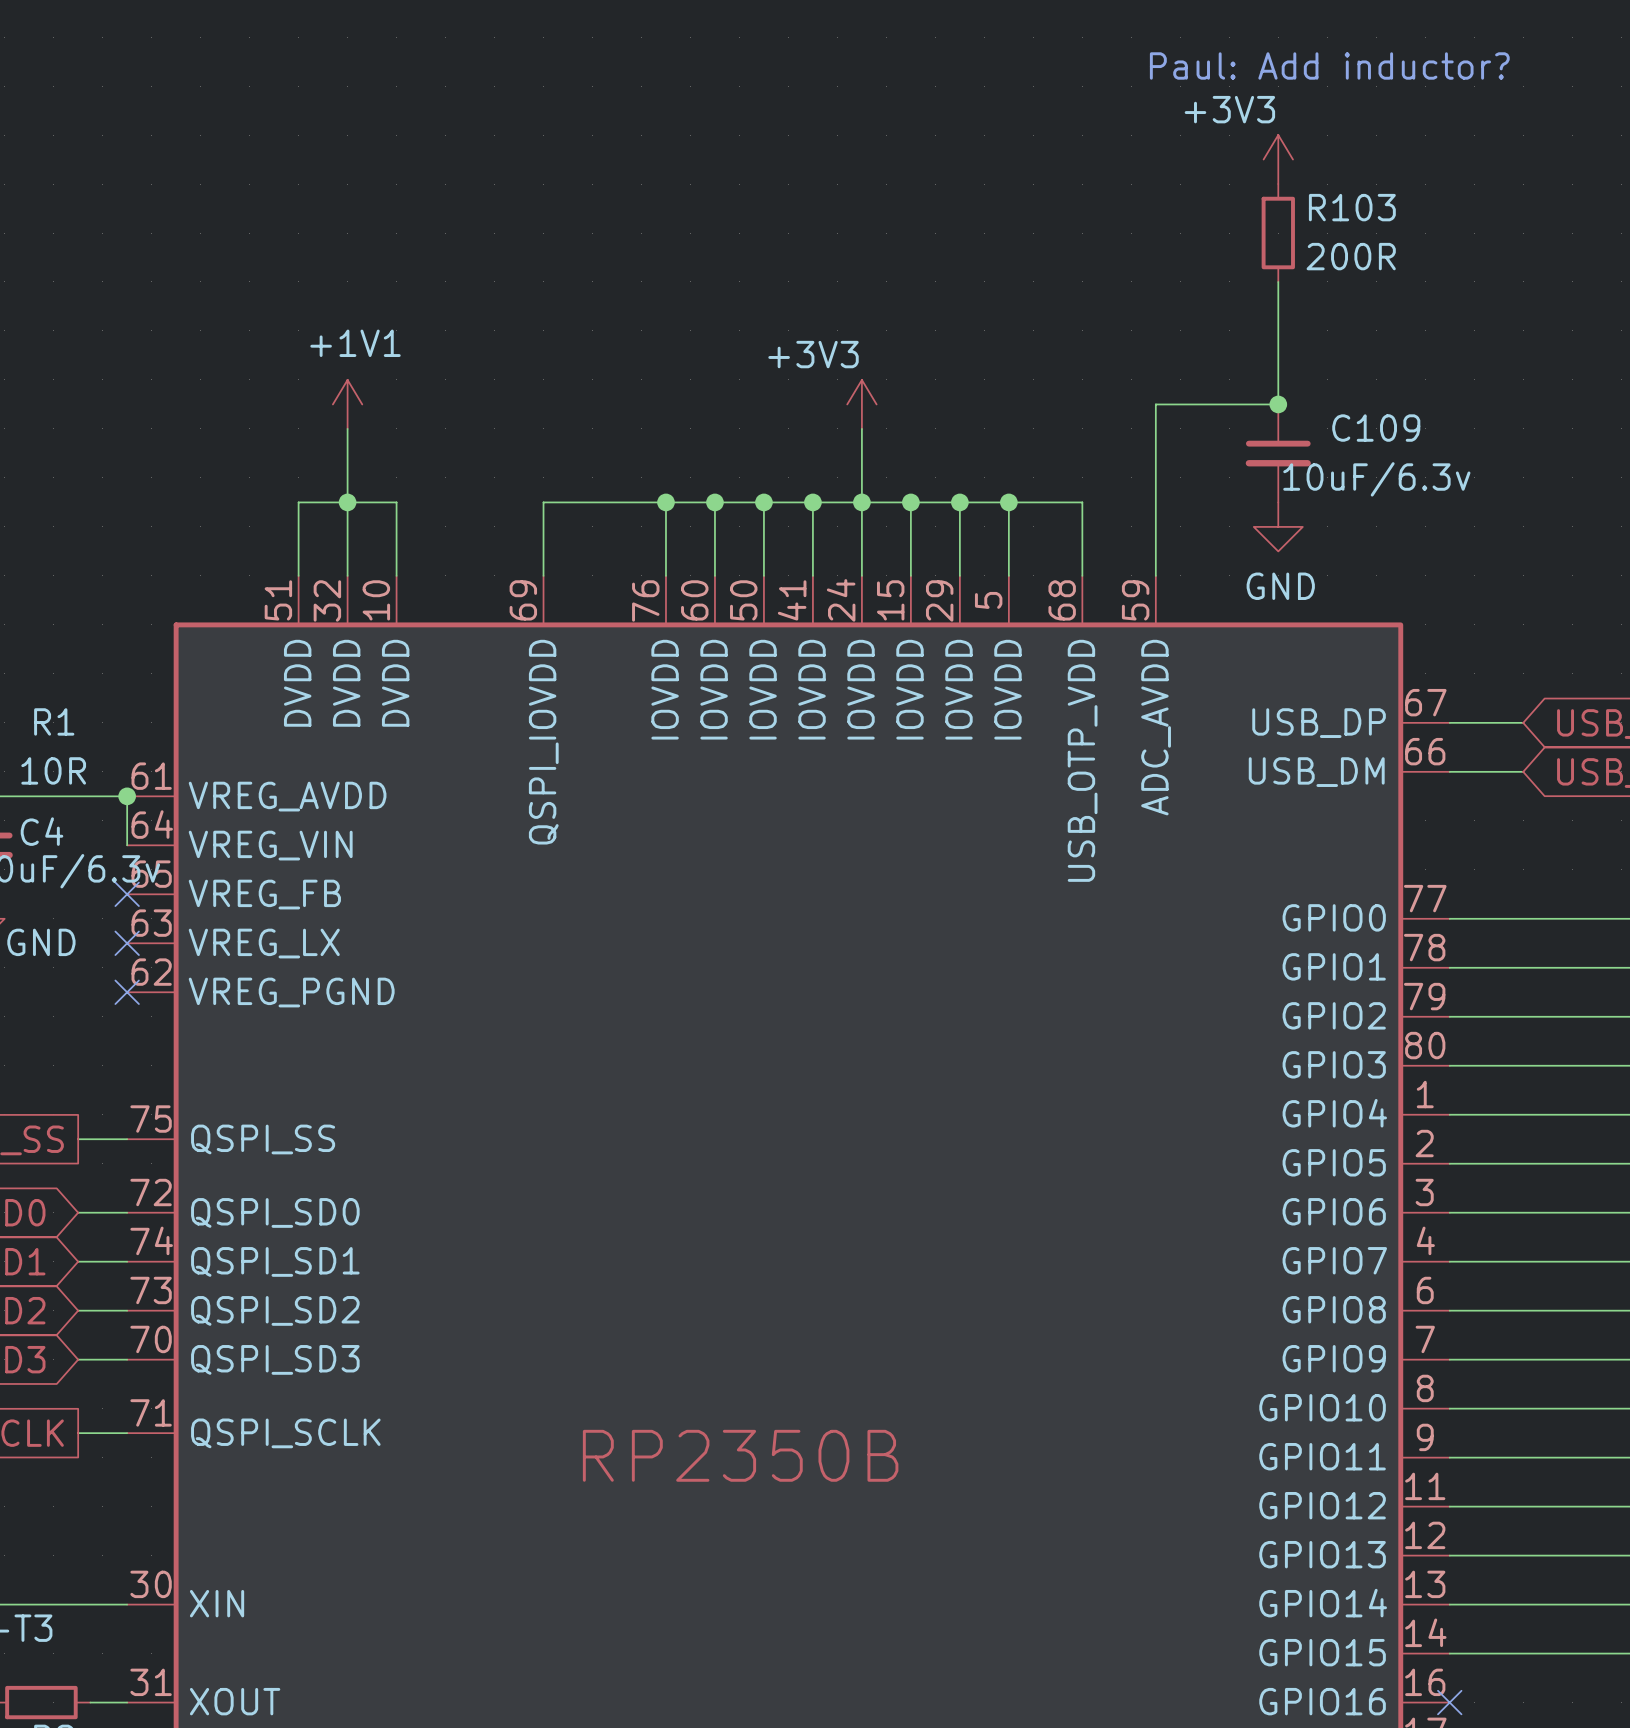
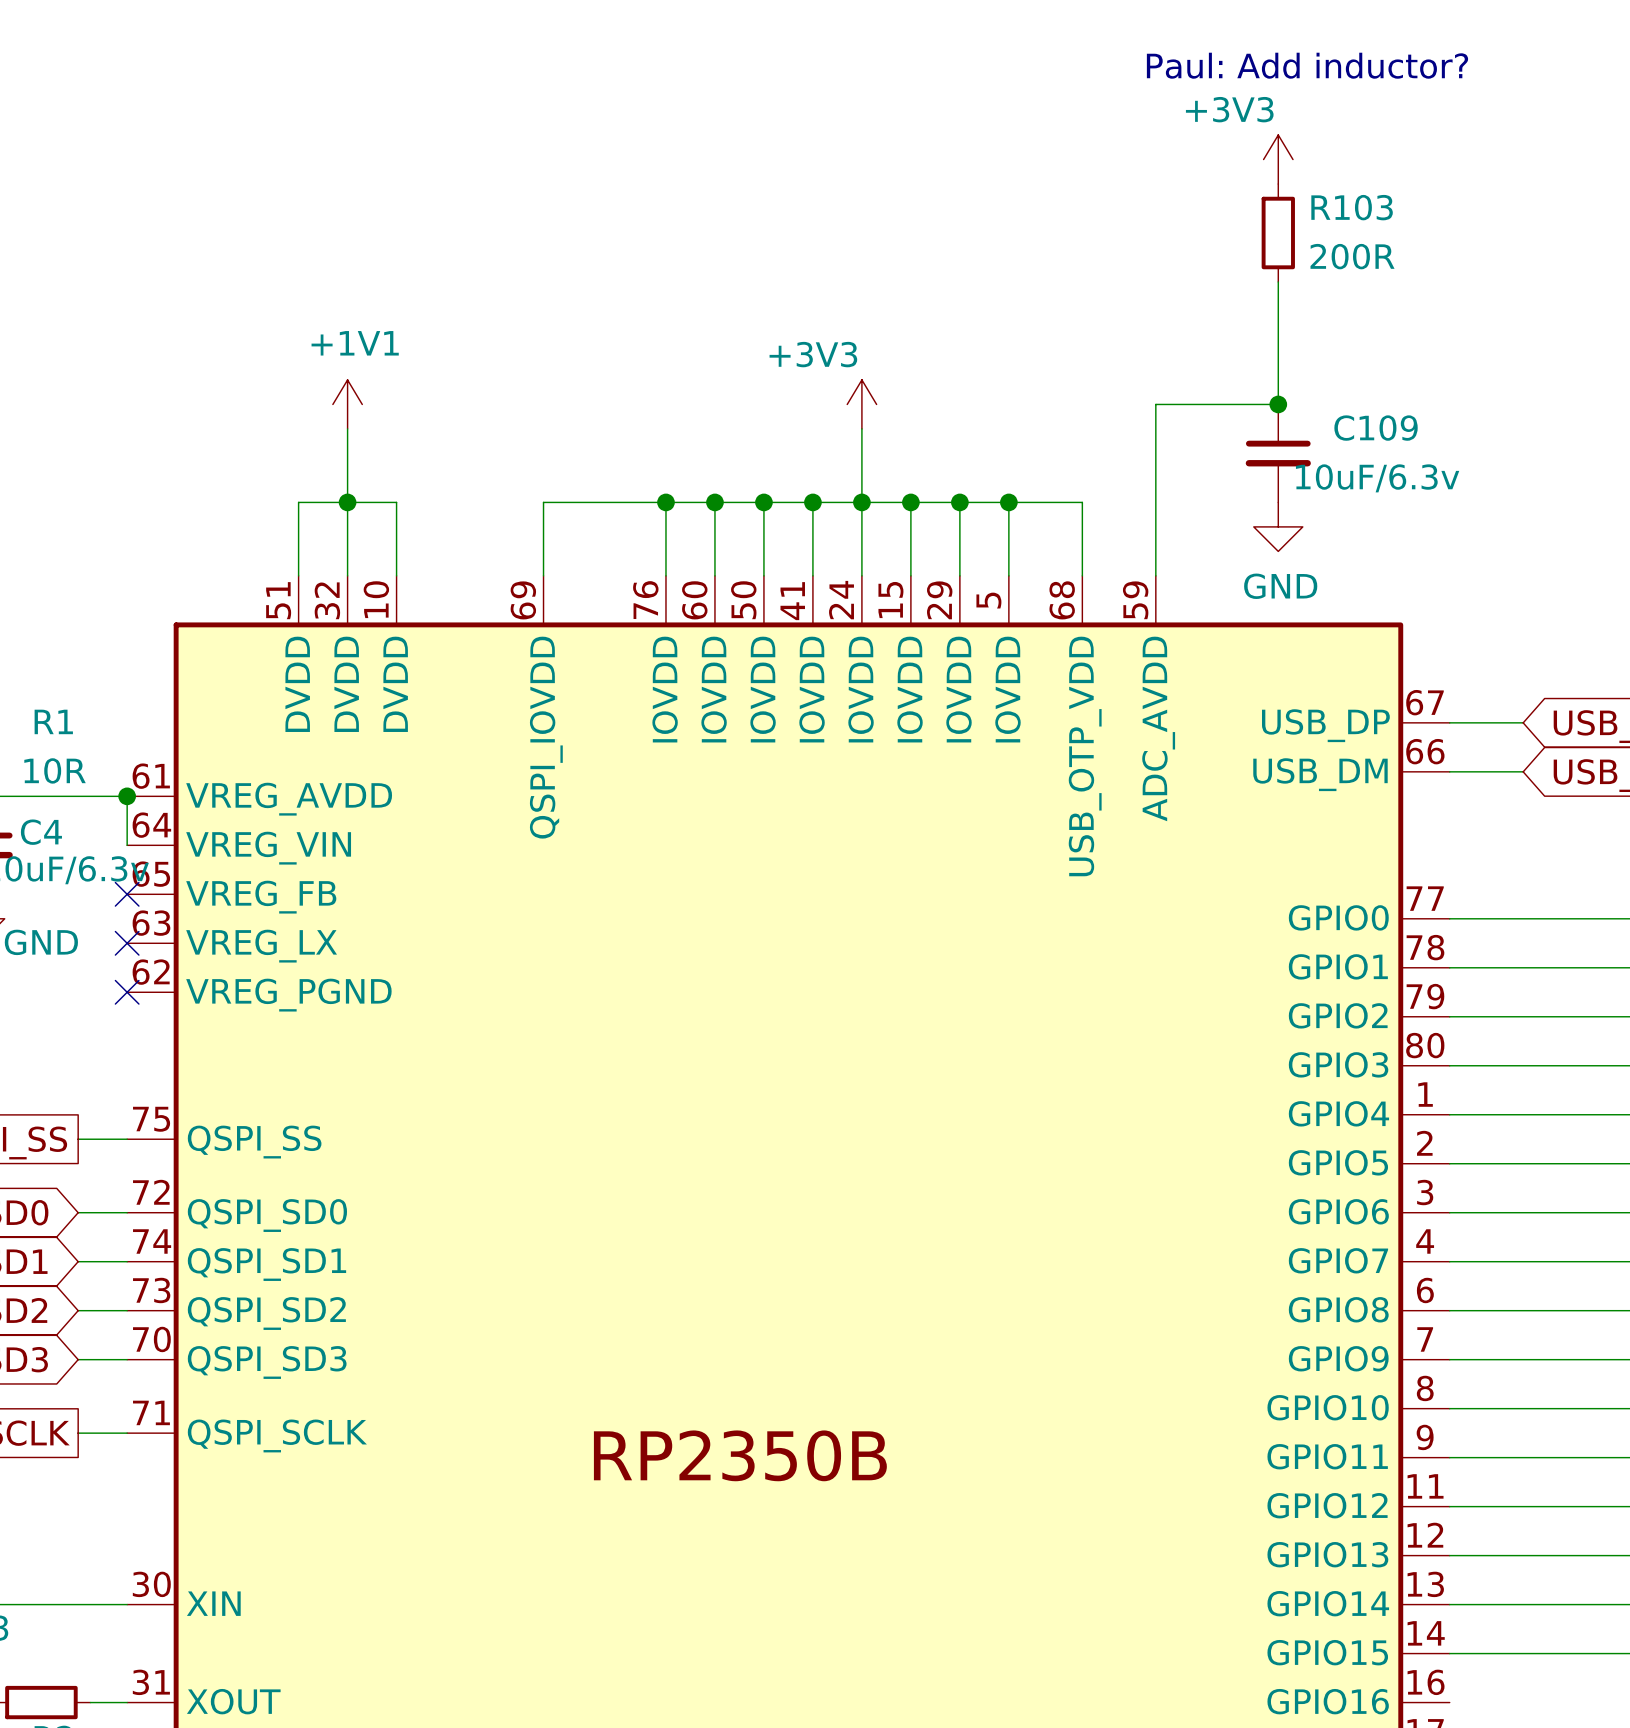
no-connect mark: (1449, 1702) -> none

